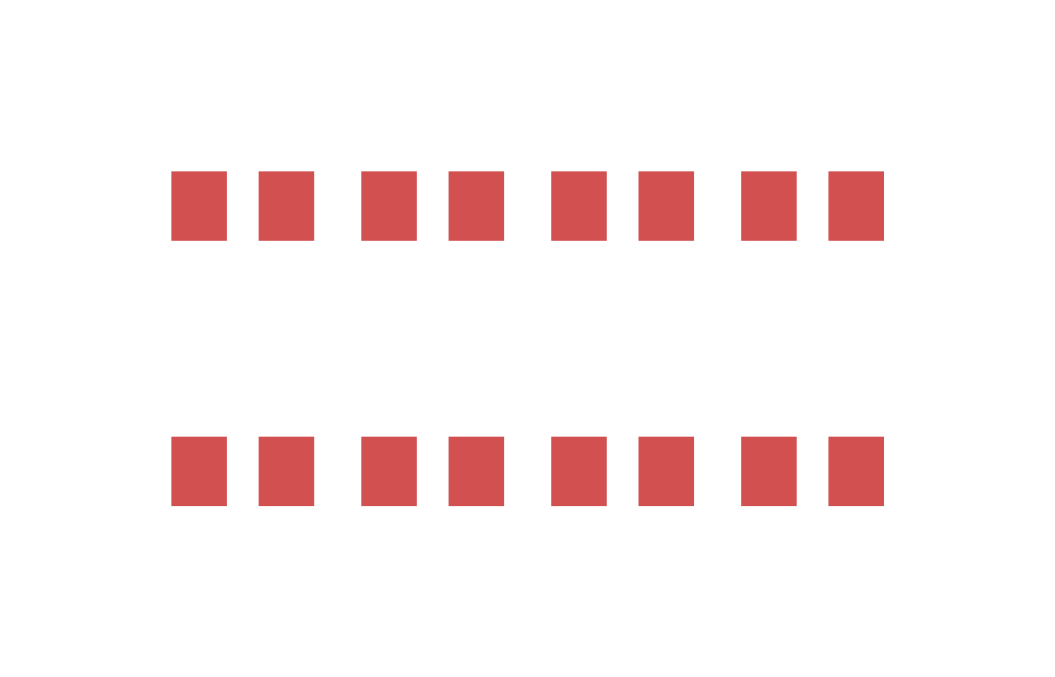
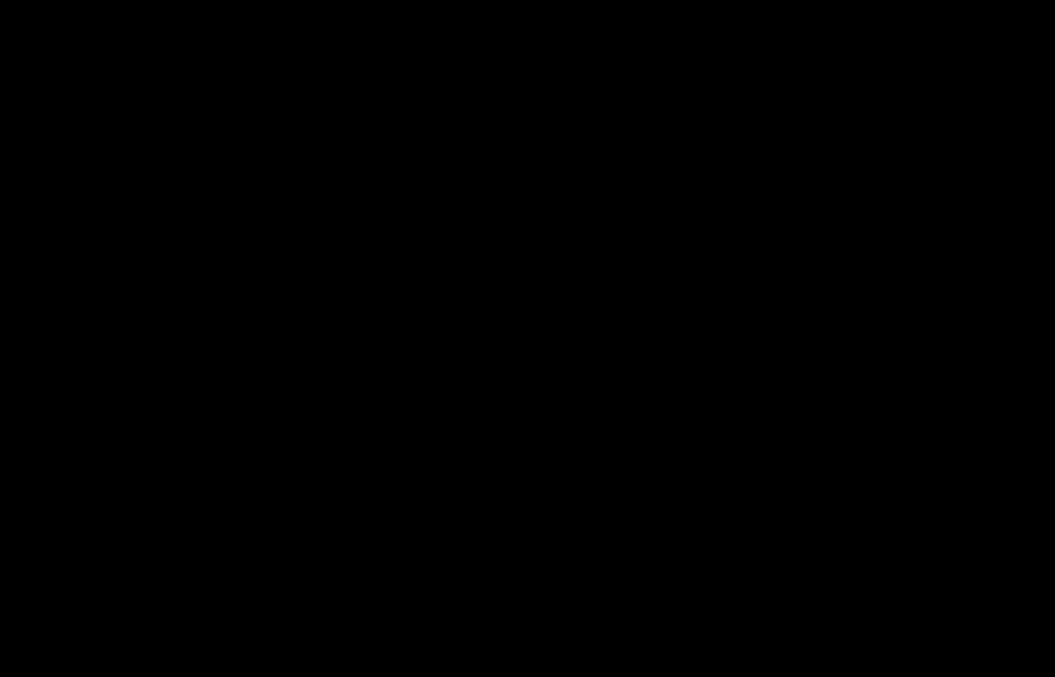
part: (242, 206) -> none
part: (432, 206) -> none
part: (622, 206) -> none
part: (812, 206) -> none
part: (242, 471) -> none
part: (432, 471) -> none
part: (622, 471) -> none
part: (812, 471) -> none

